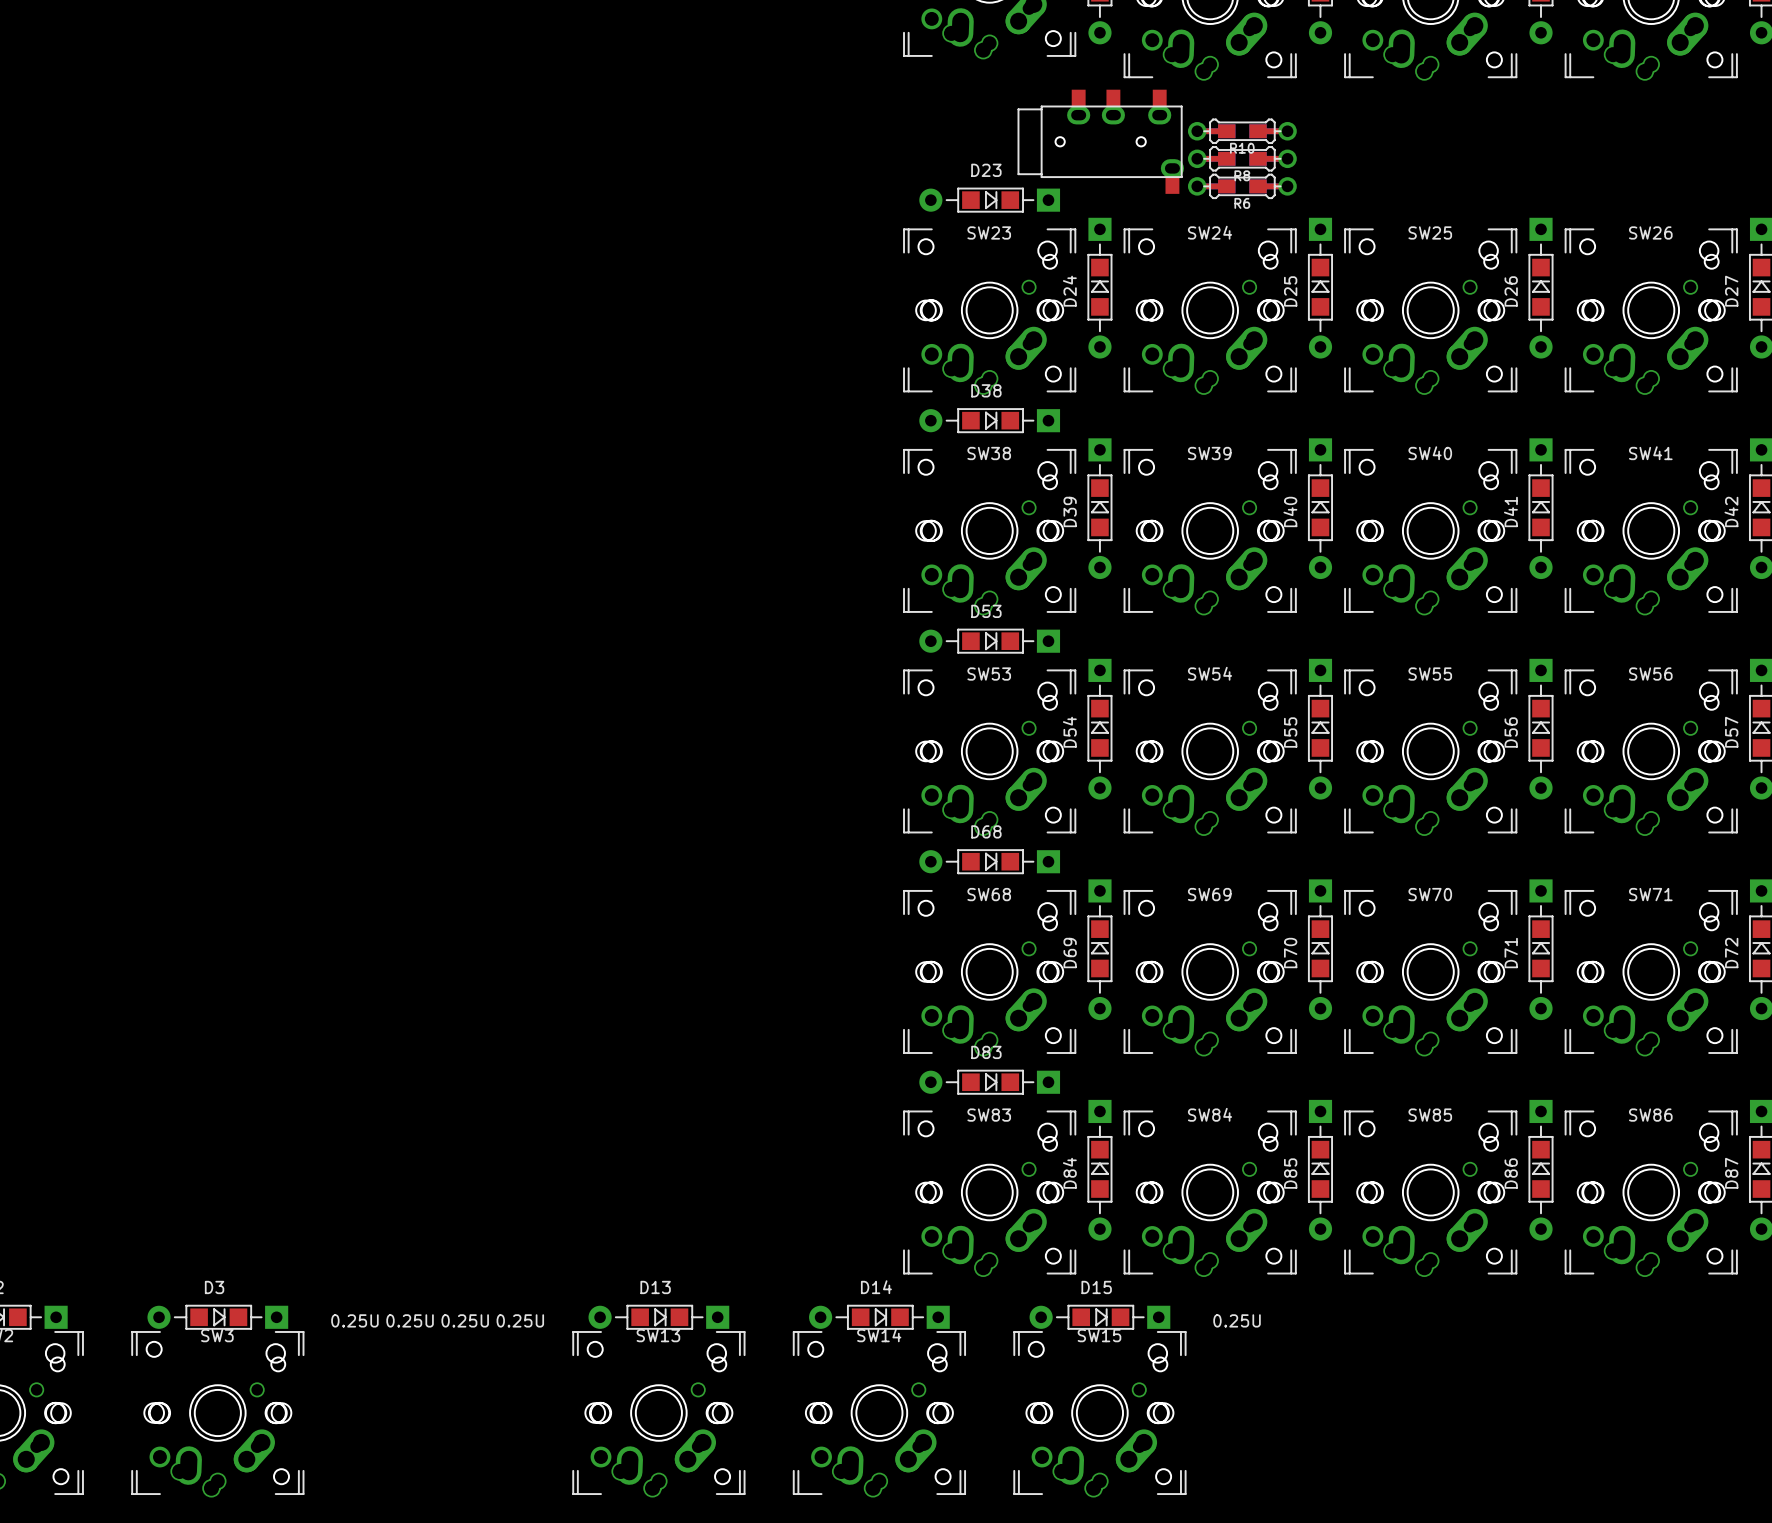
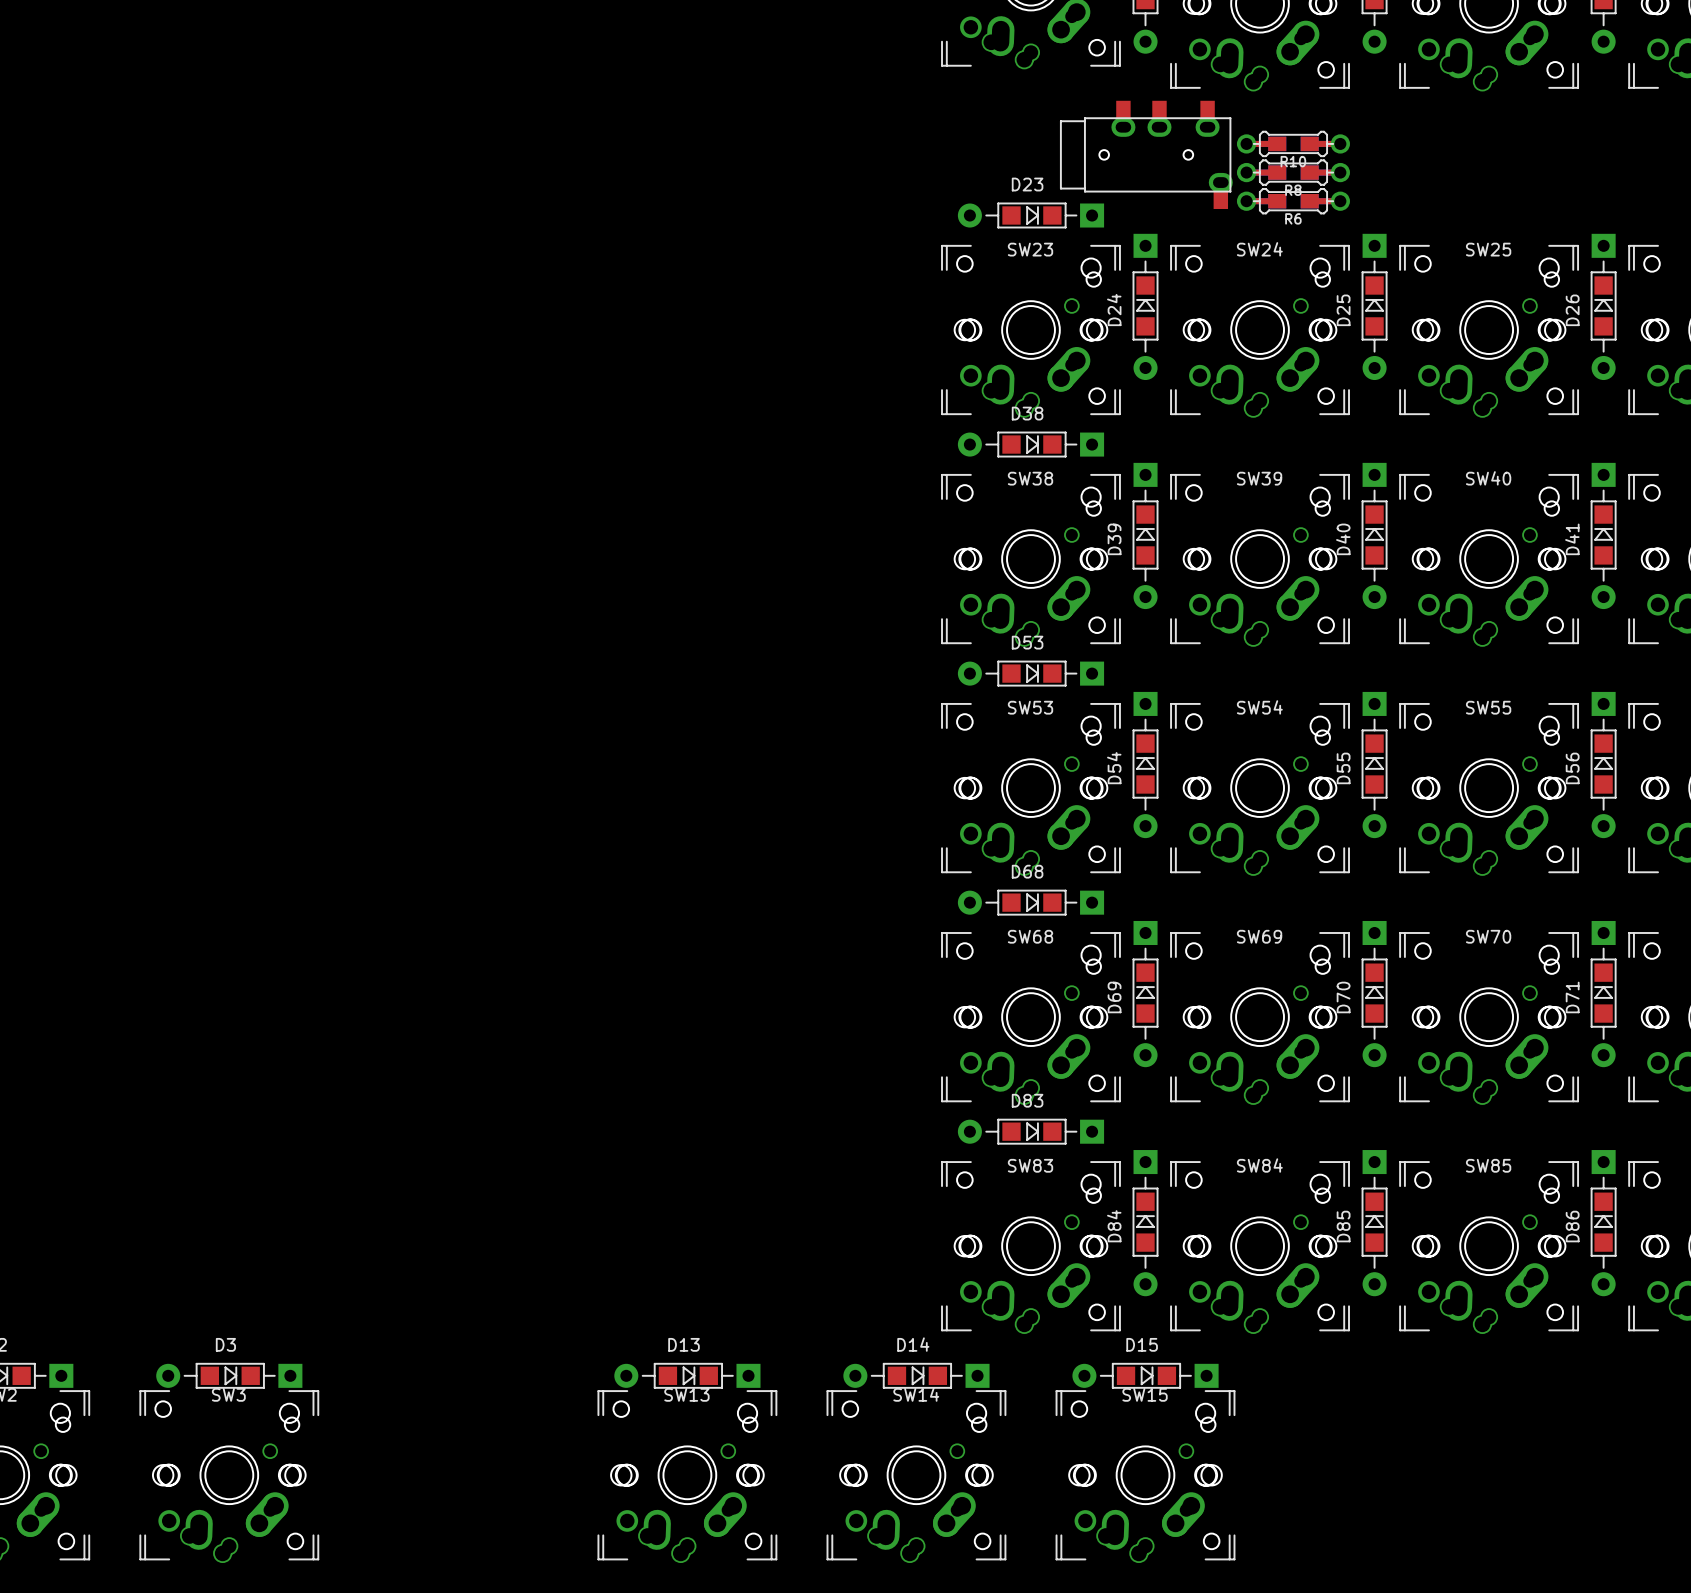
0.25U: (354, 1320) -> none
0.25U: (410, 1320) -> none
0.25U: (465, 1320) -> none
0.25U: (520, 1320) -> none
0.25U: (1237, 1320) -> none

